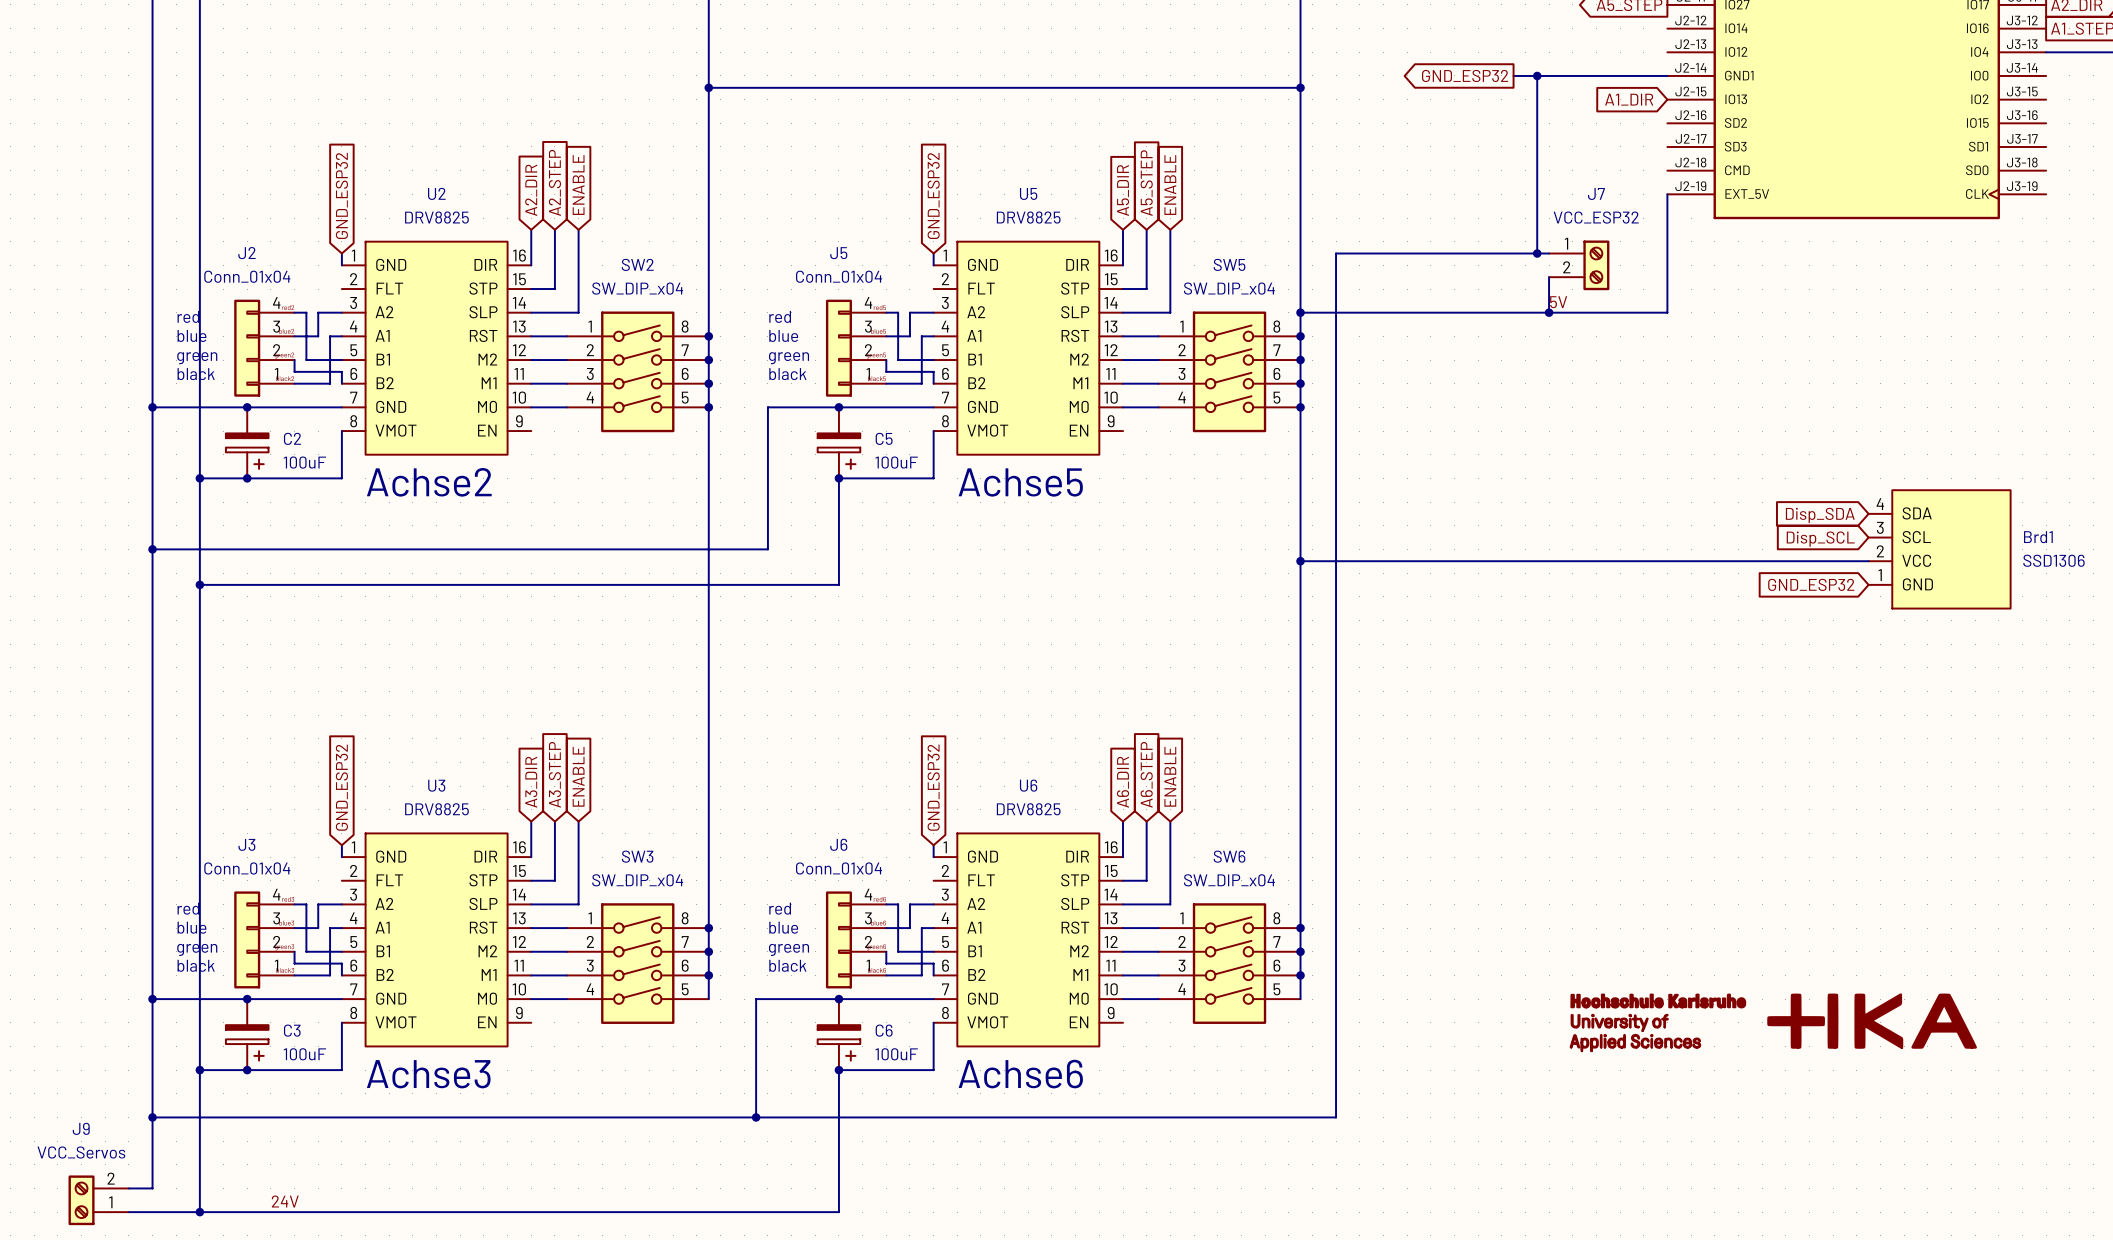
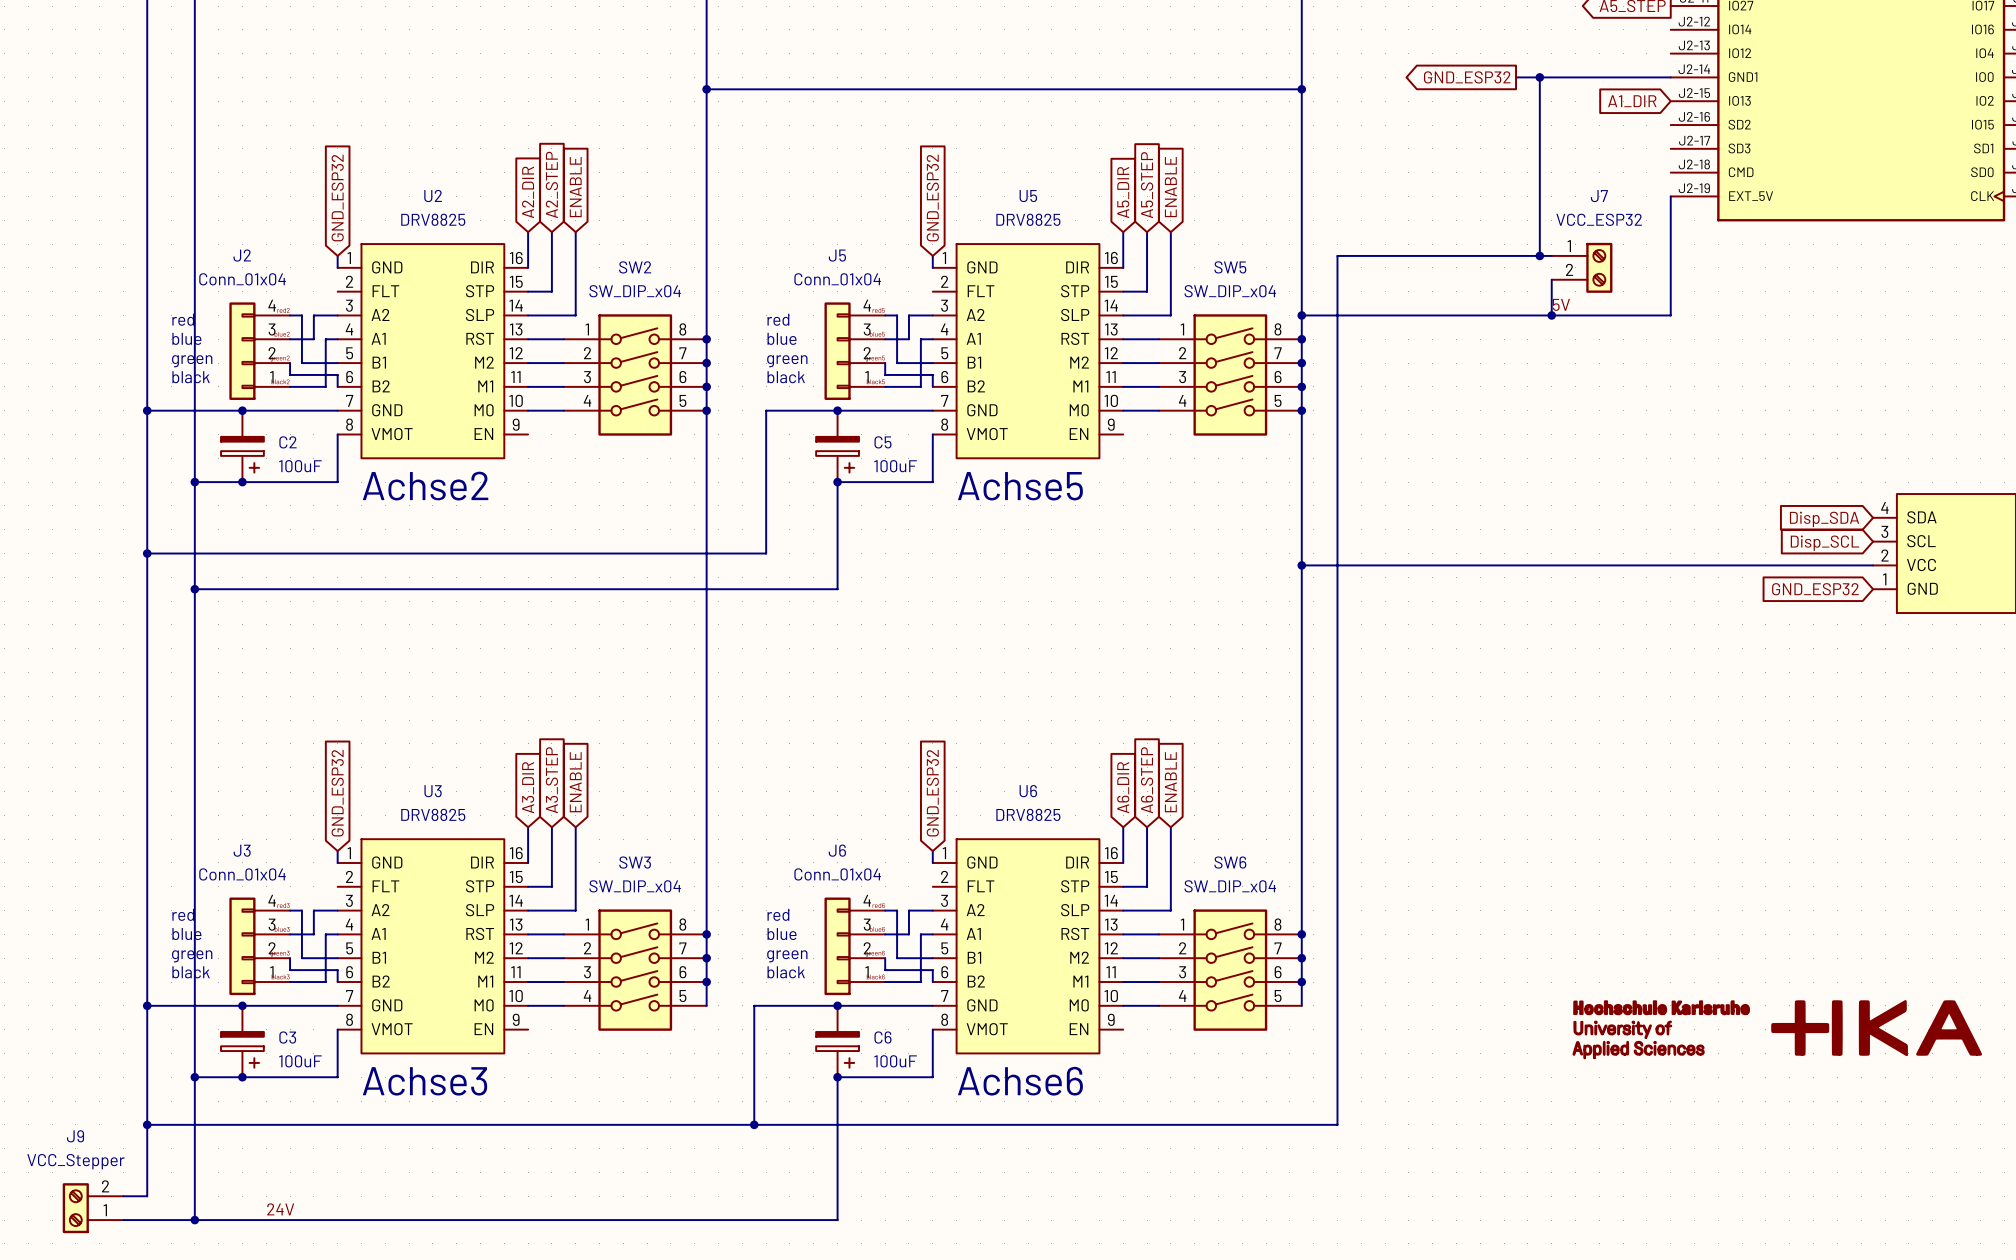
J9 value: VCC_Servos (81, 1152) -> VCC_Stepper (75, 1161)

